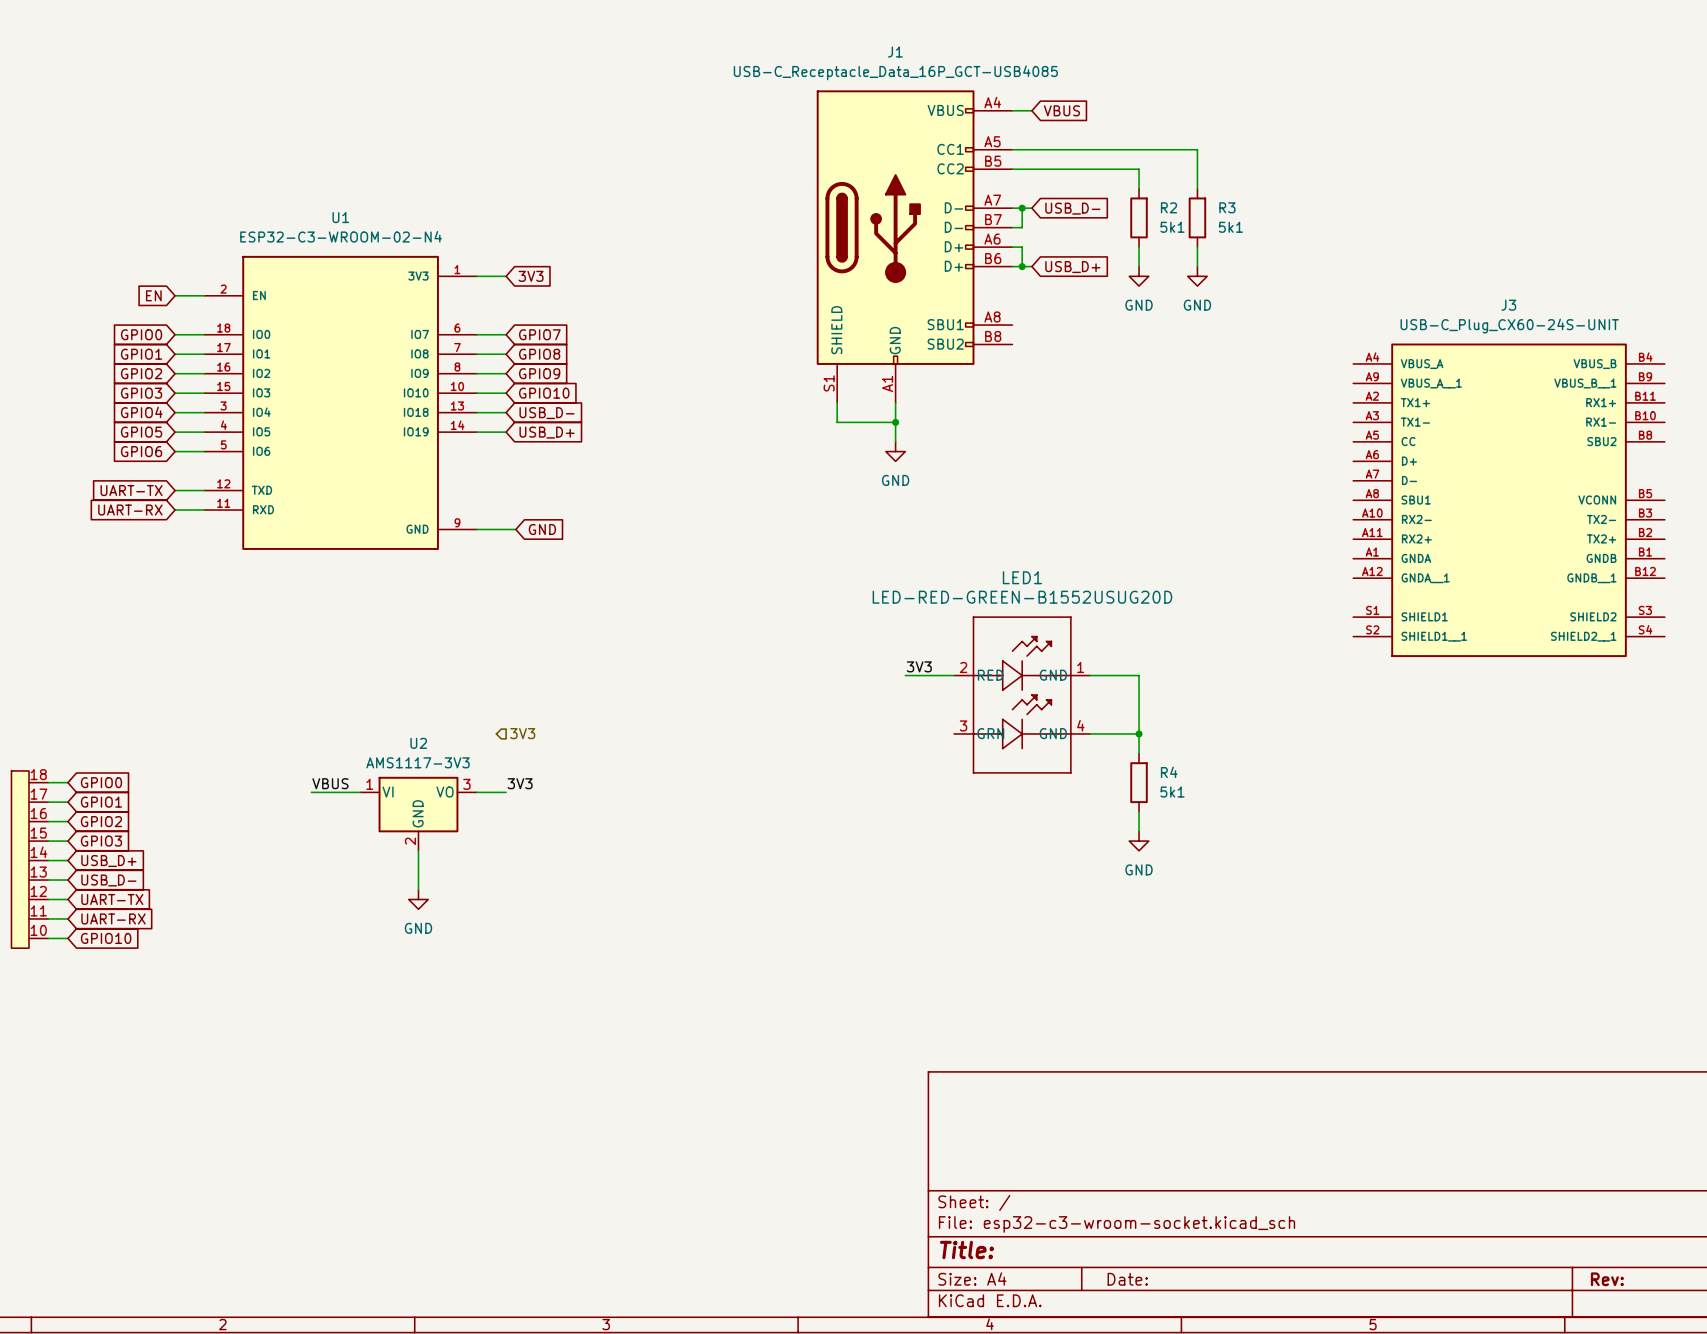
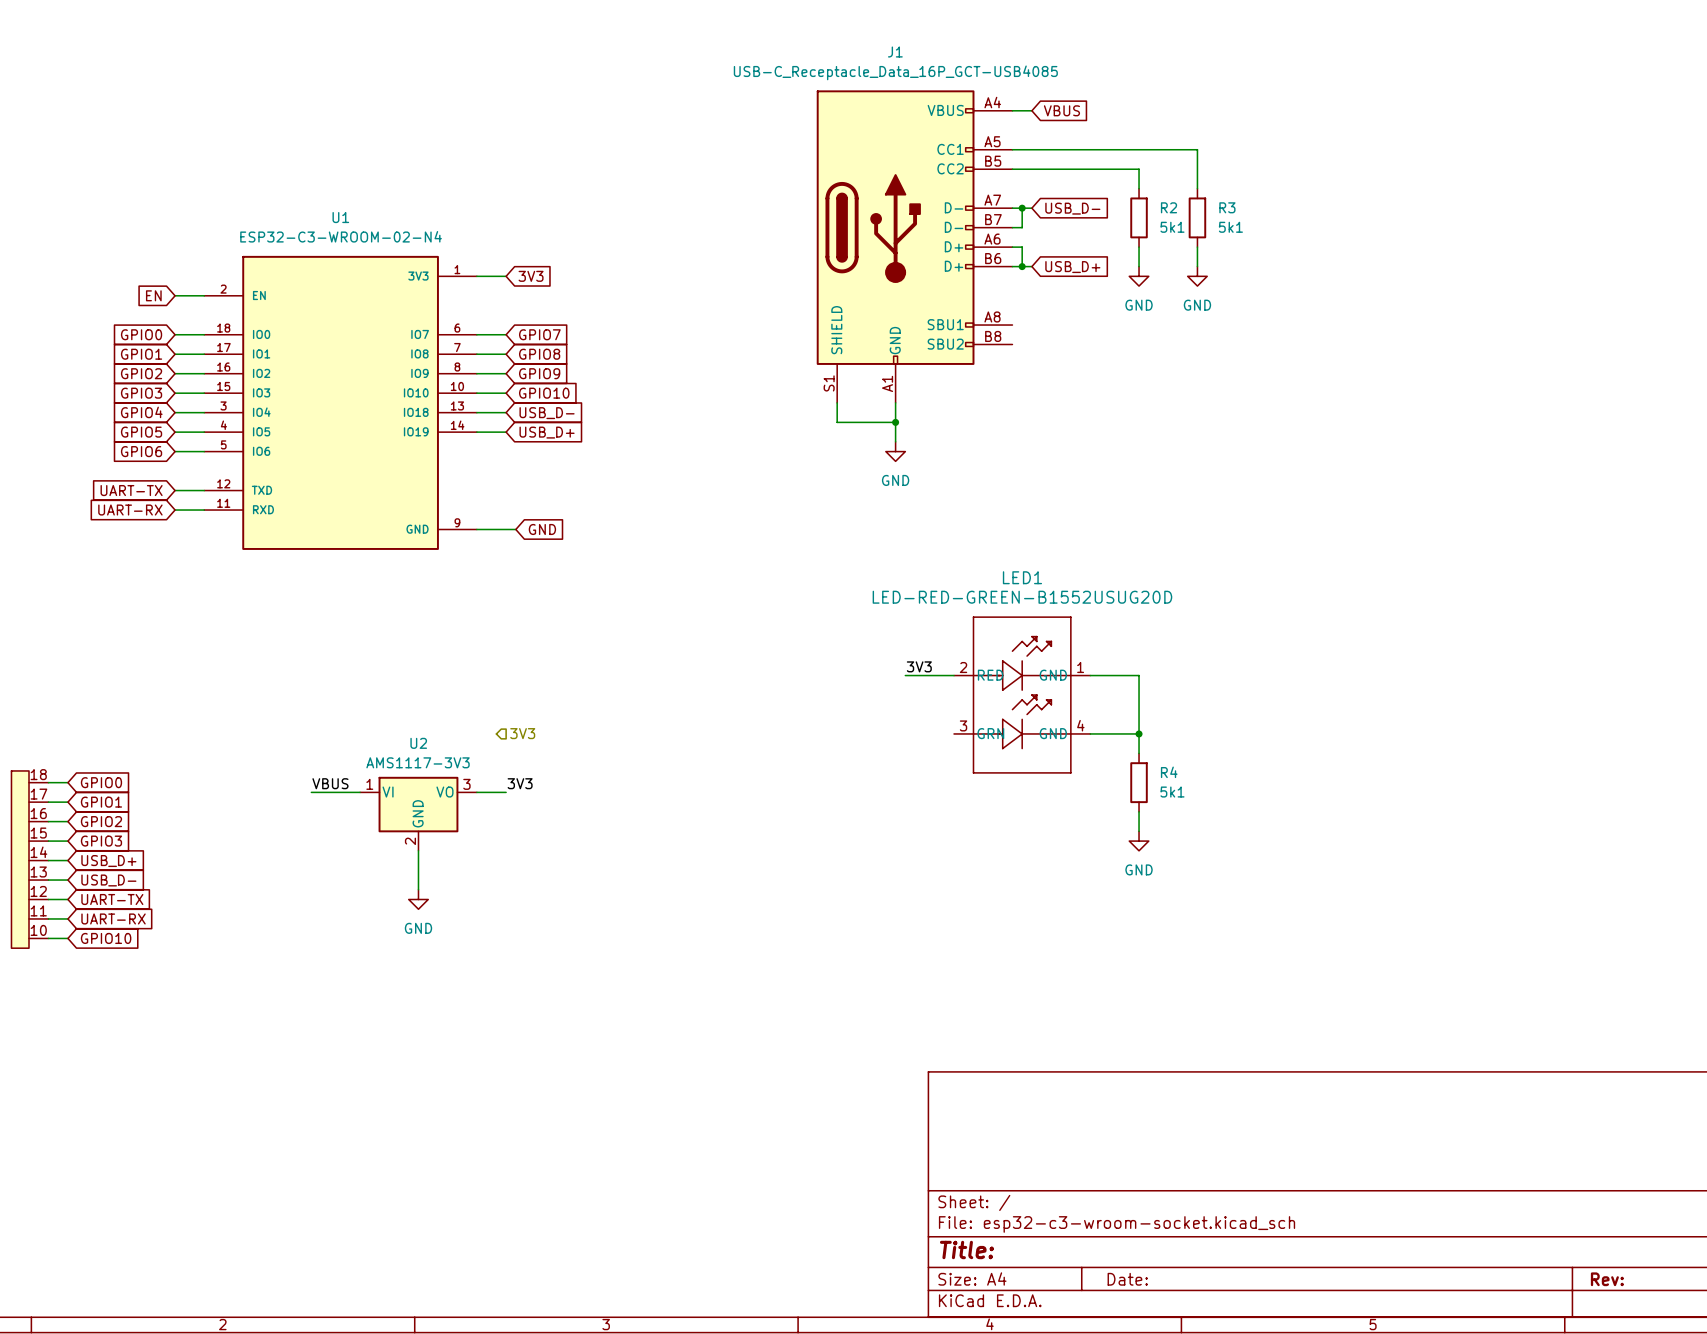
J3: USB-C_Plug_CX60-24S-UNIT (1509, 500) -> none

